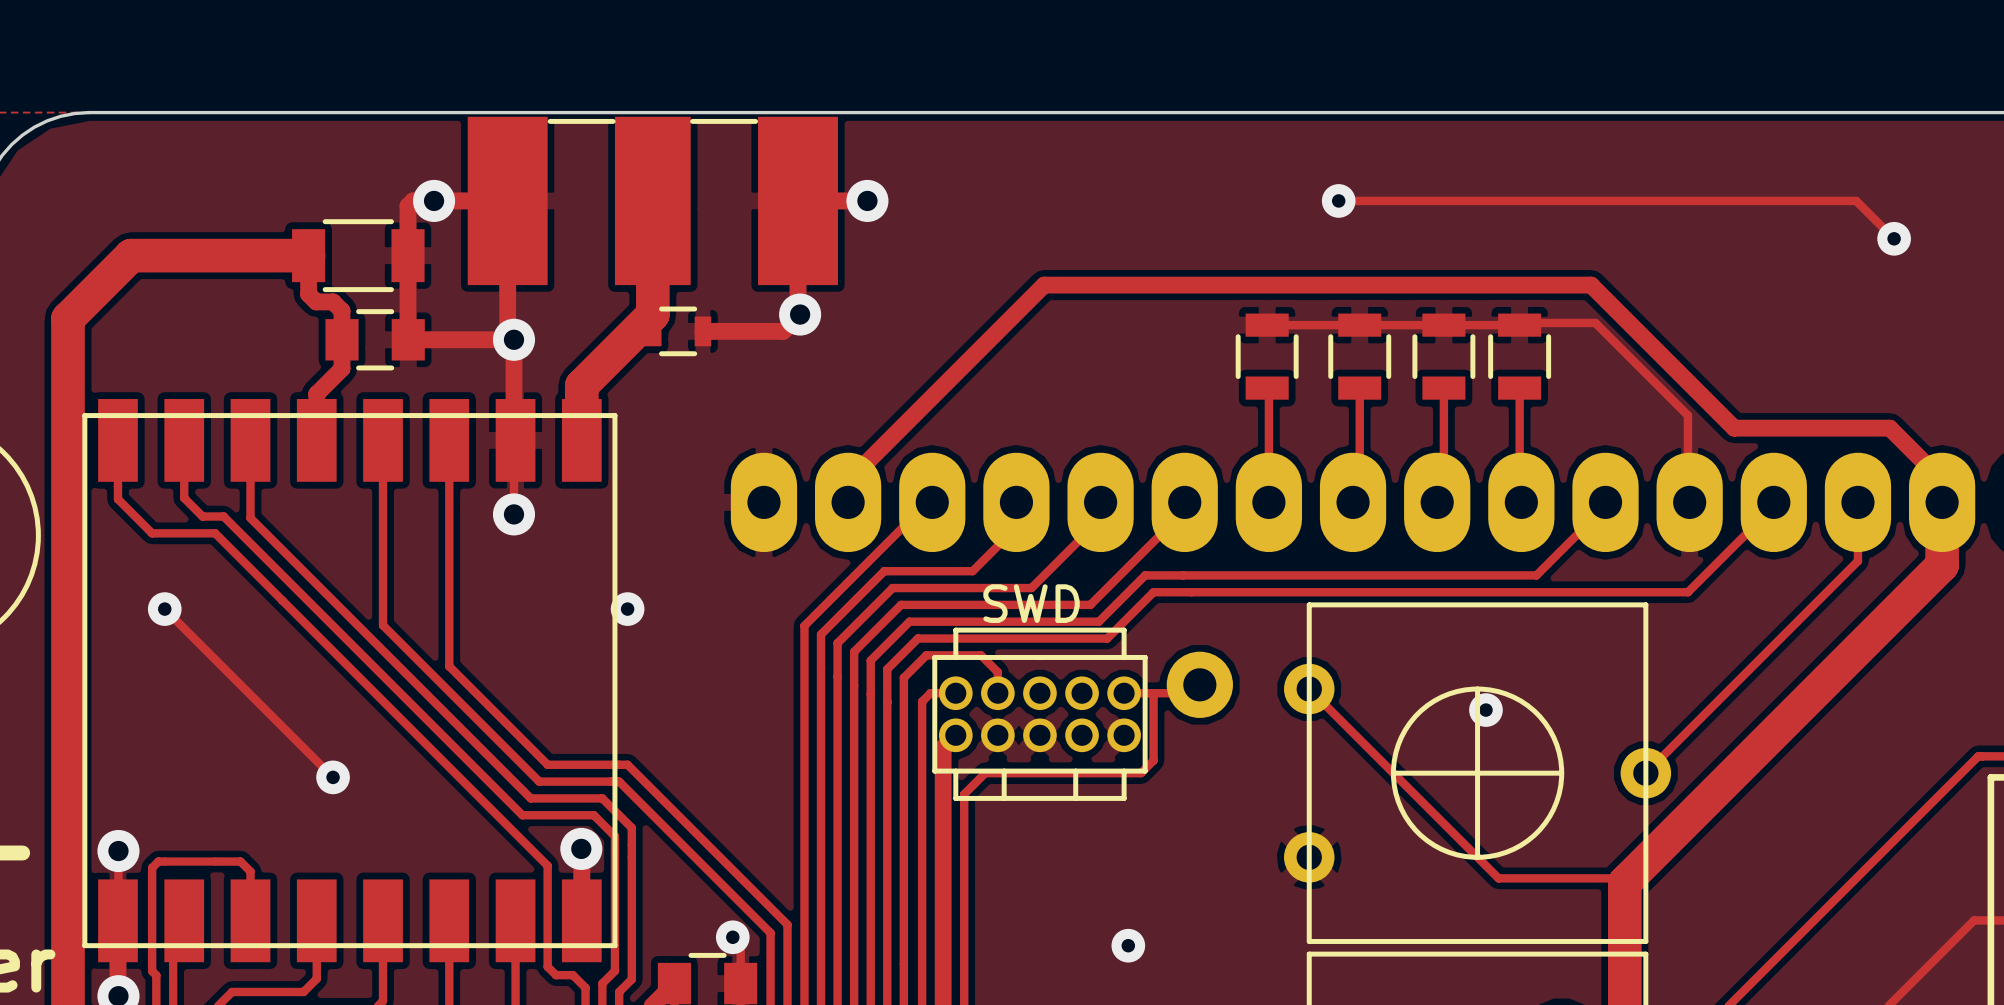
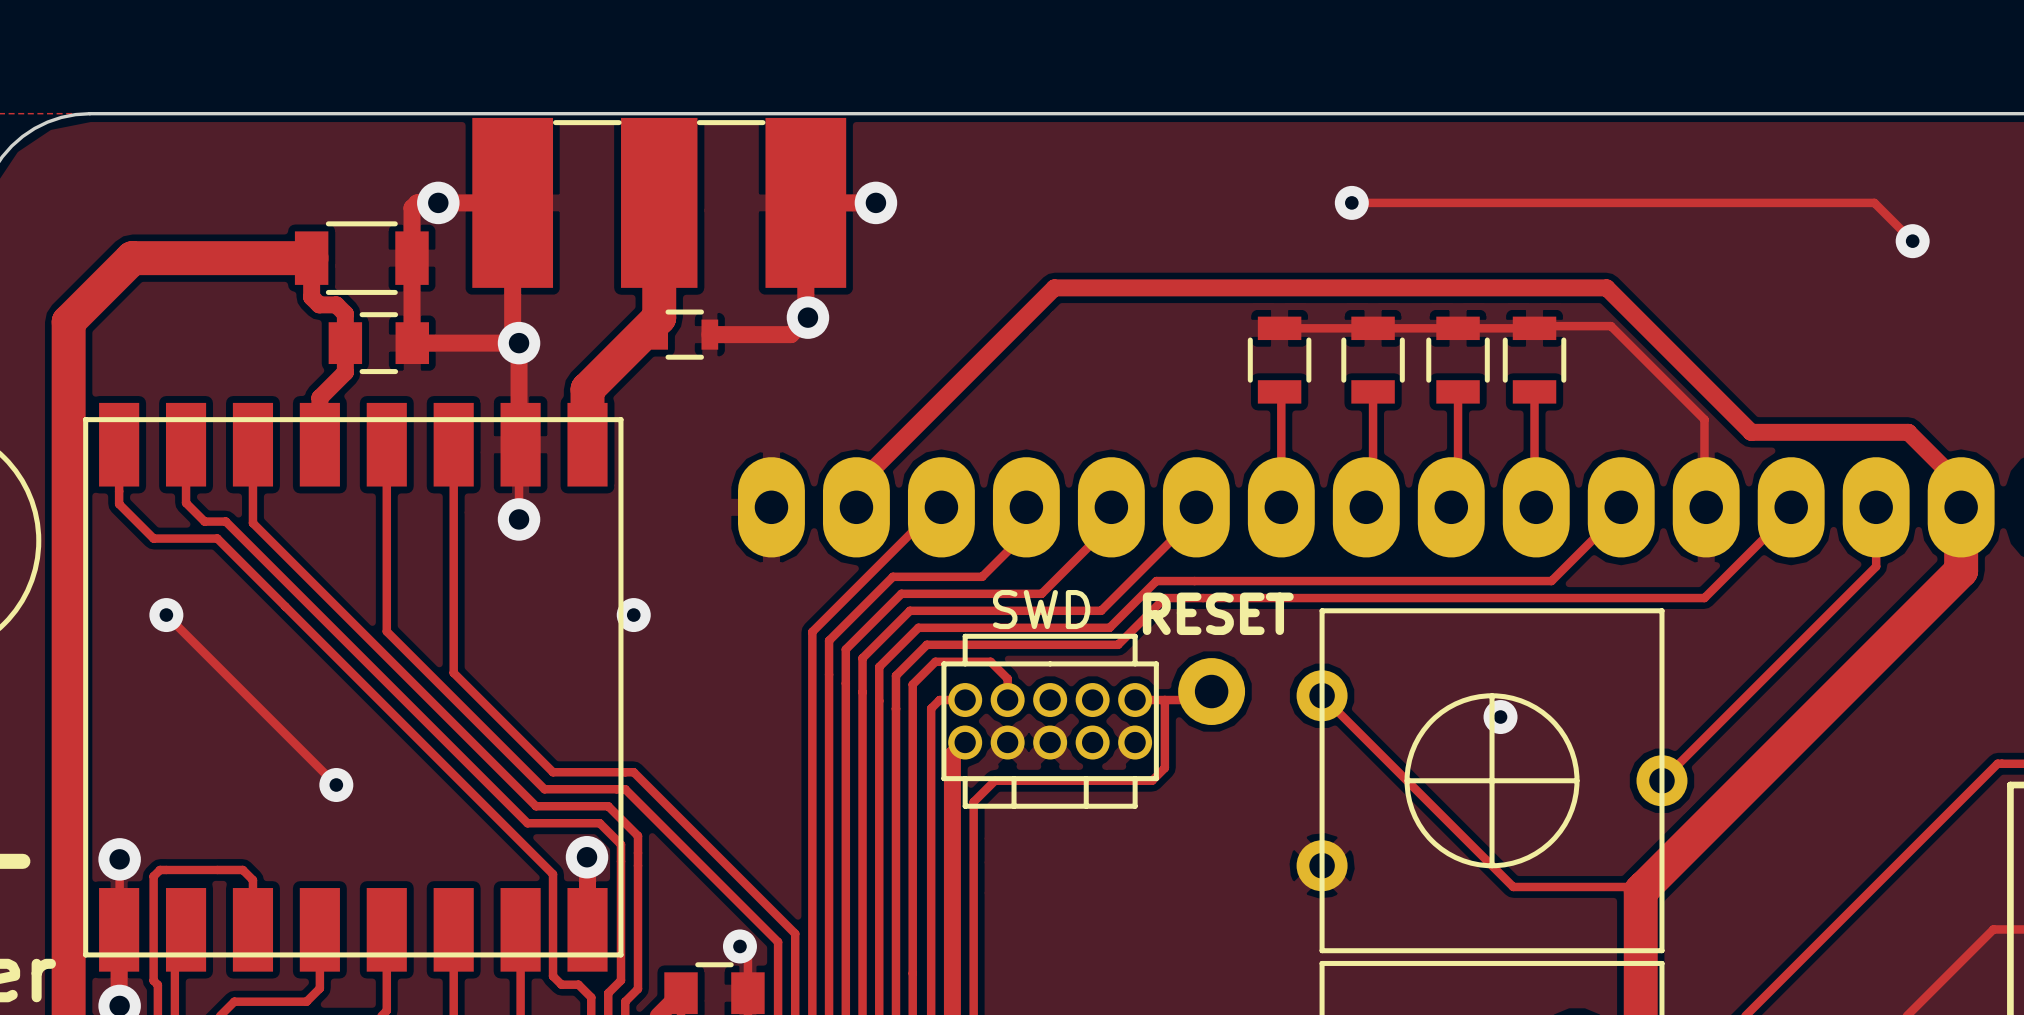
text: none -> RESET (1218, 613)
via: (1128, 945) -> none

